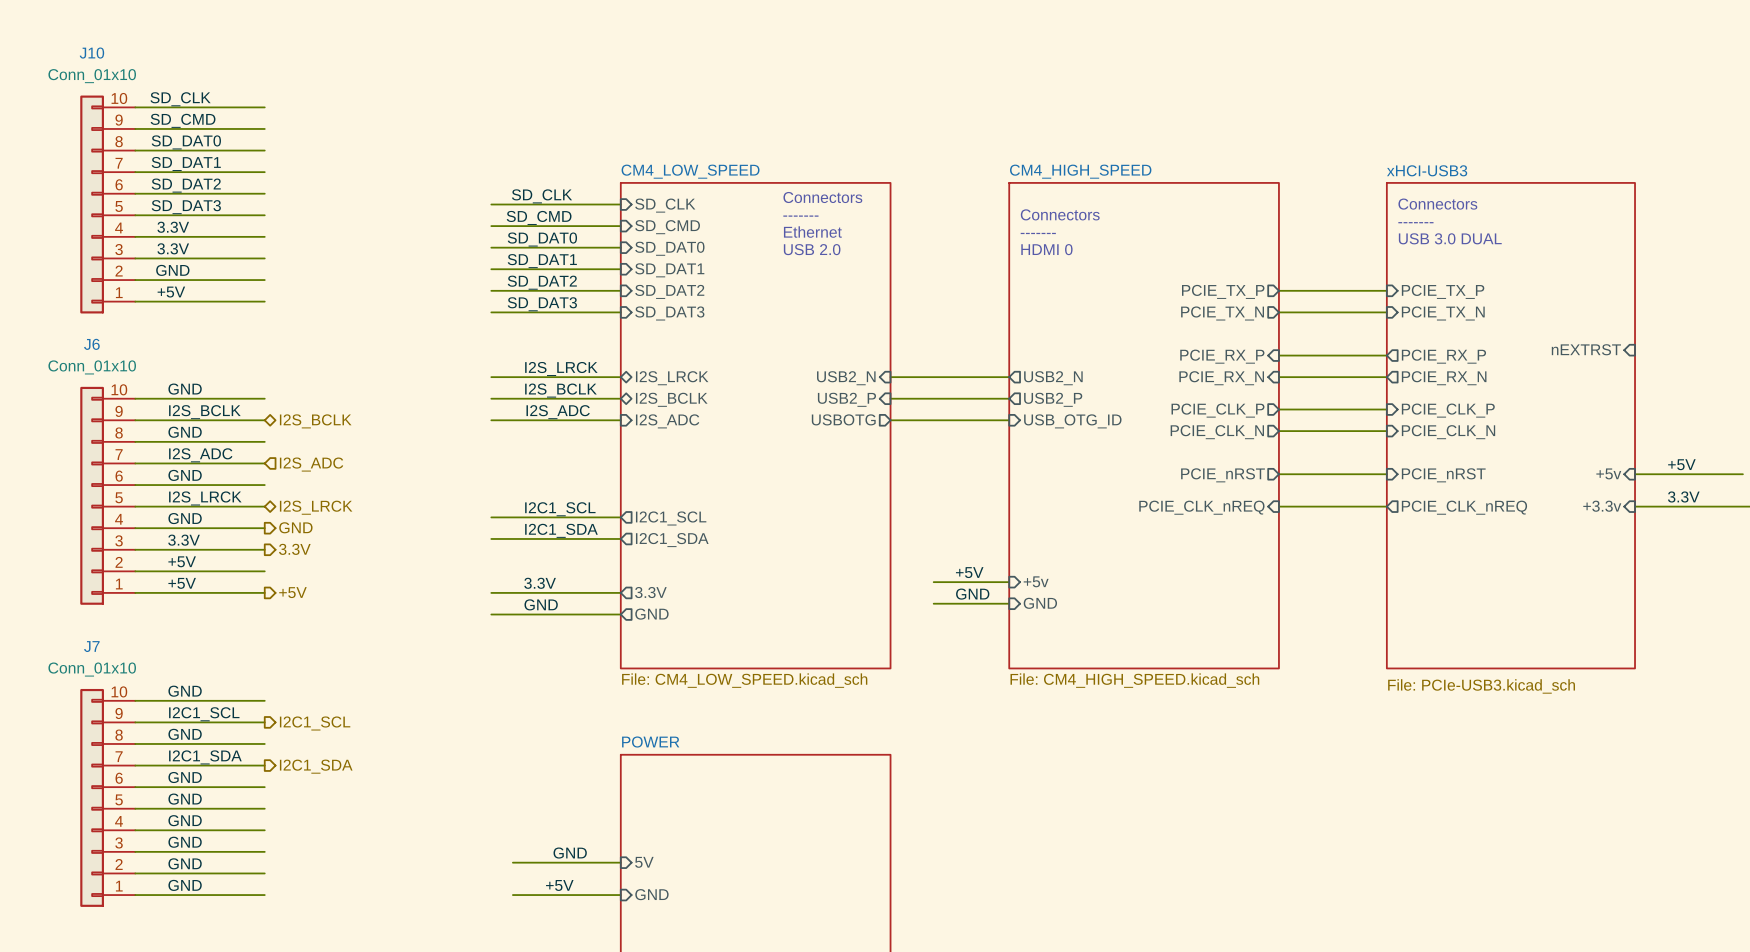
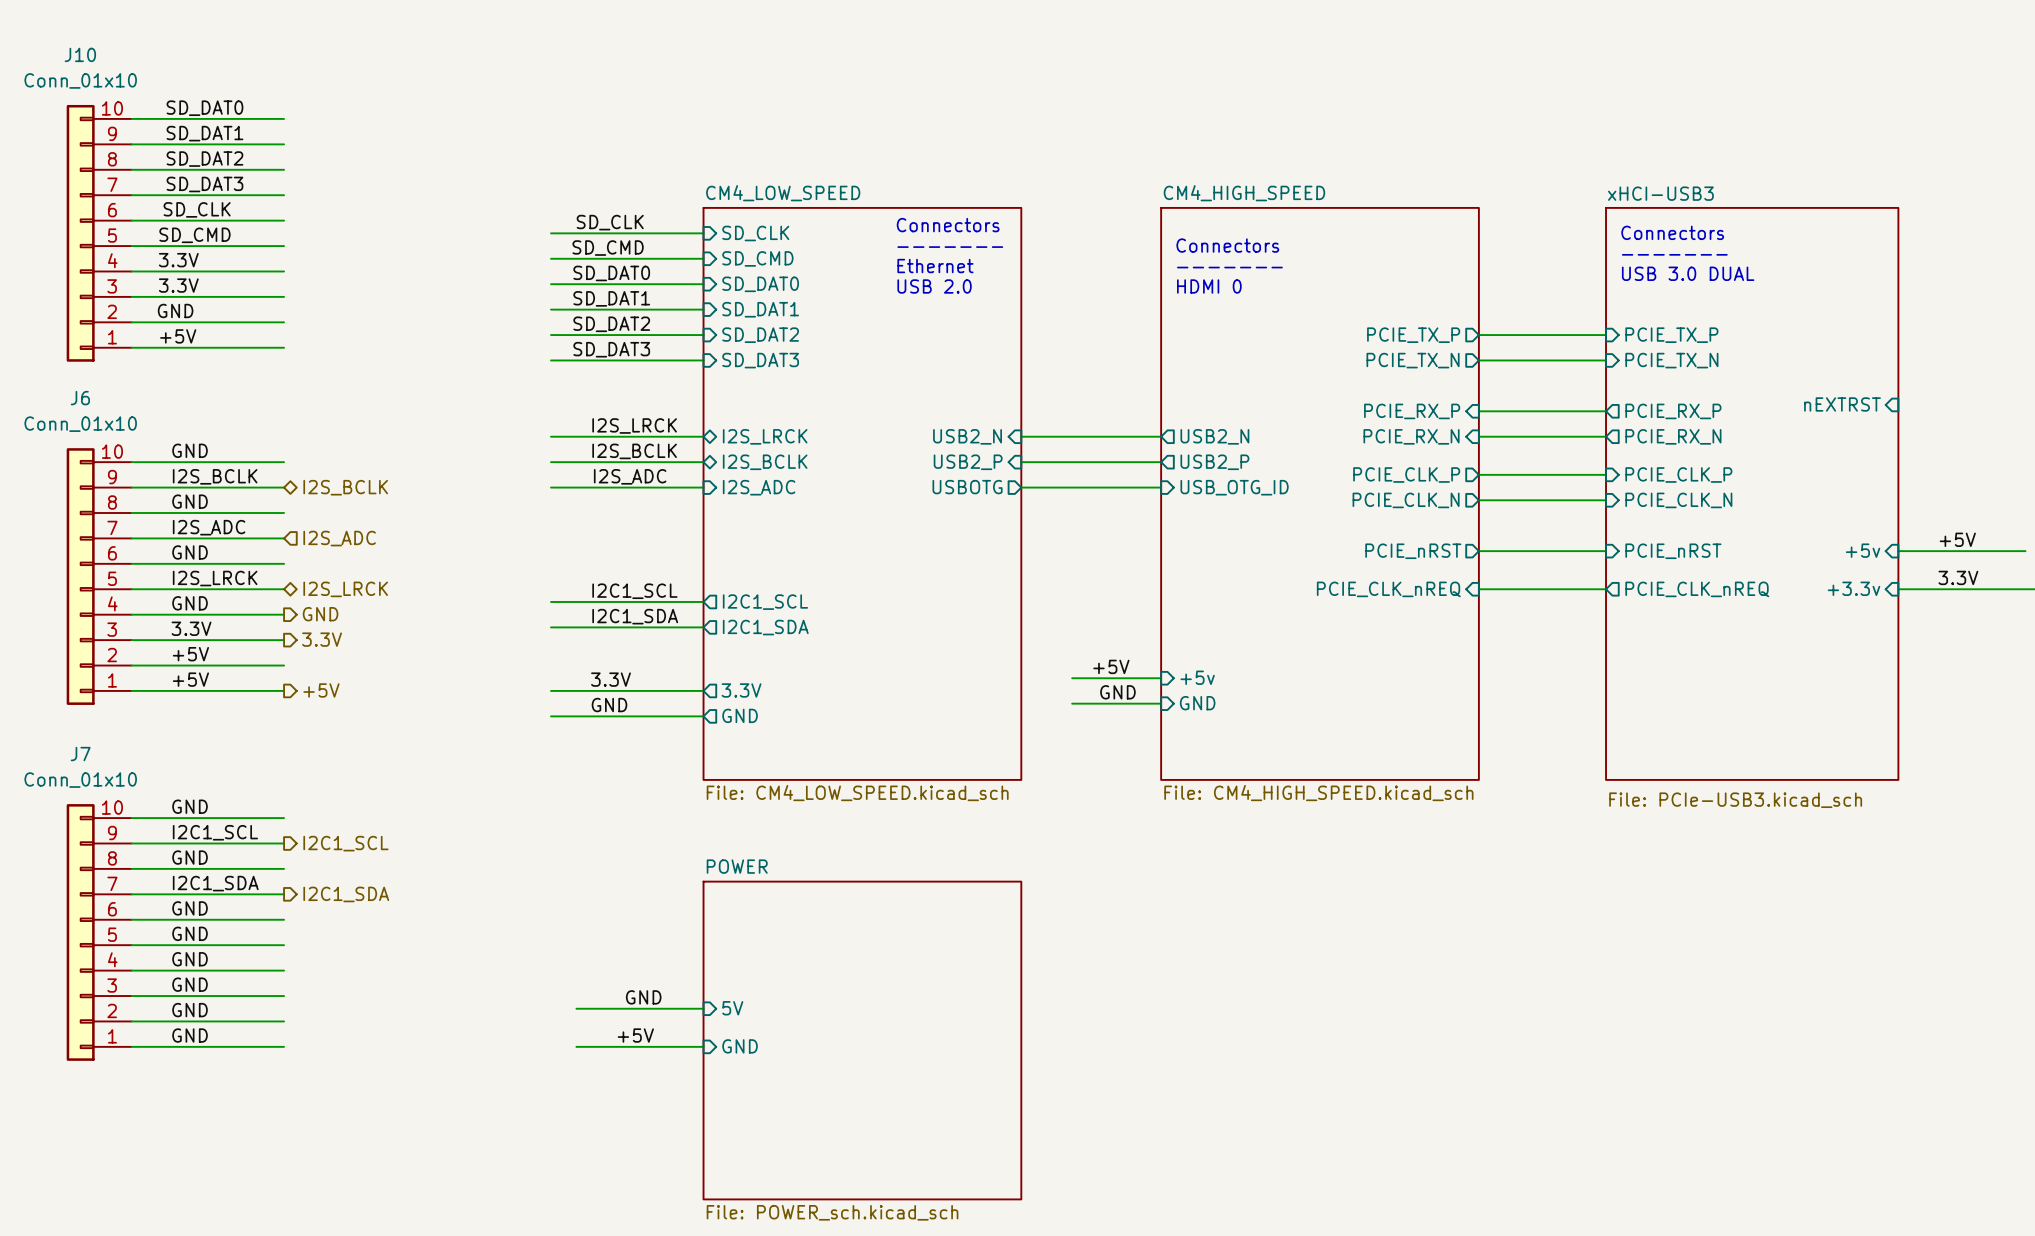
label: SD_CLK (180, 99) -> none
label: SD_CMD (183, 120) -> SD_DAT2 (204, 159)
label position: SD_DAT0 (186, 142) -> SD_DAT0 (204, 108)
label position: SD_DAT1 (186, 163) -> SD_DAT1 (204, 133)
label: none -> SD_DAT3 (204, 184)
label: SD_DAT2 (186, 185) -> SD_CLK (197, 209)
label: SD_DAT3 (186, 207) -> SD_CMD (194, 235)

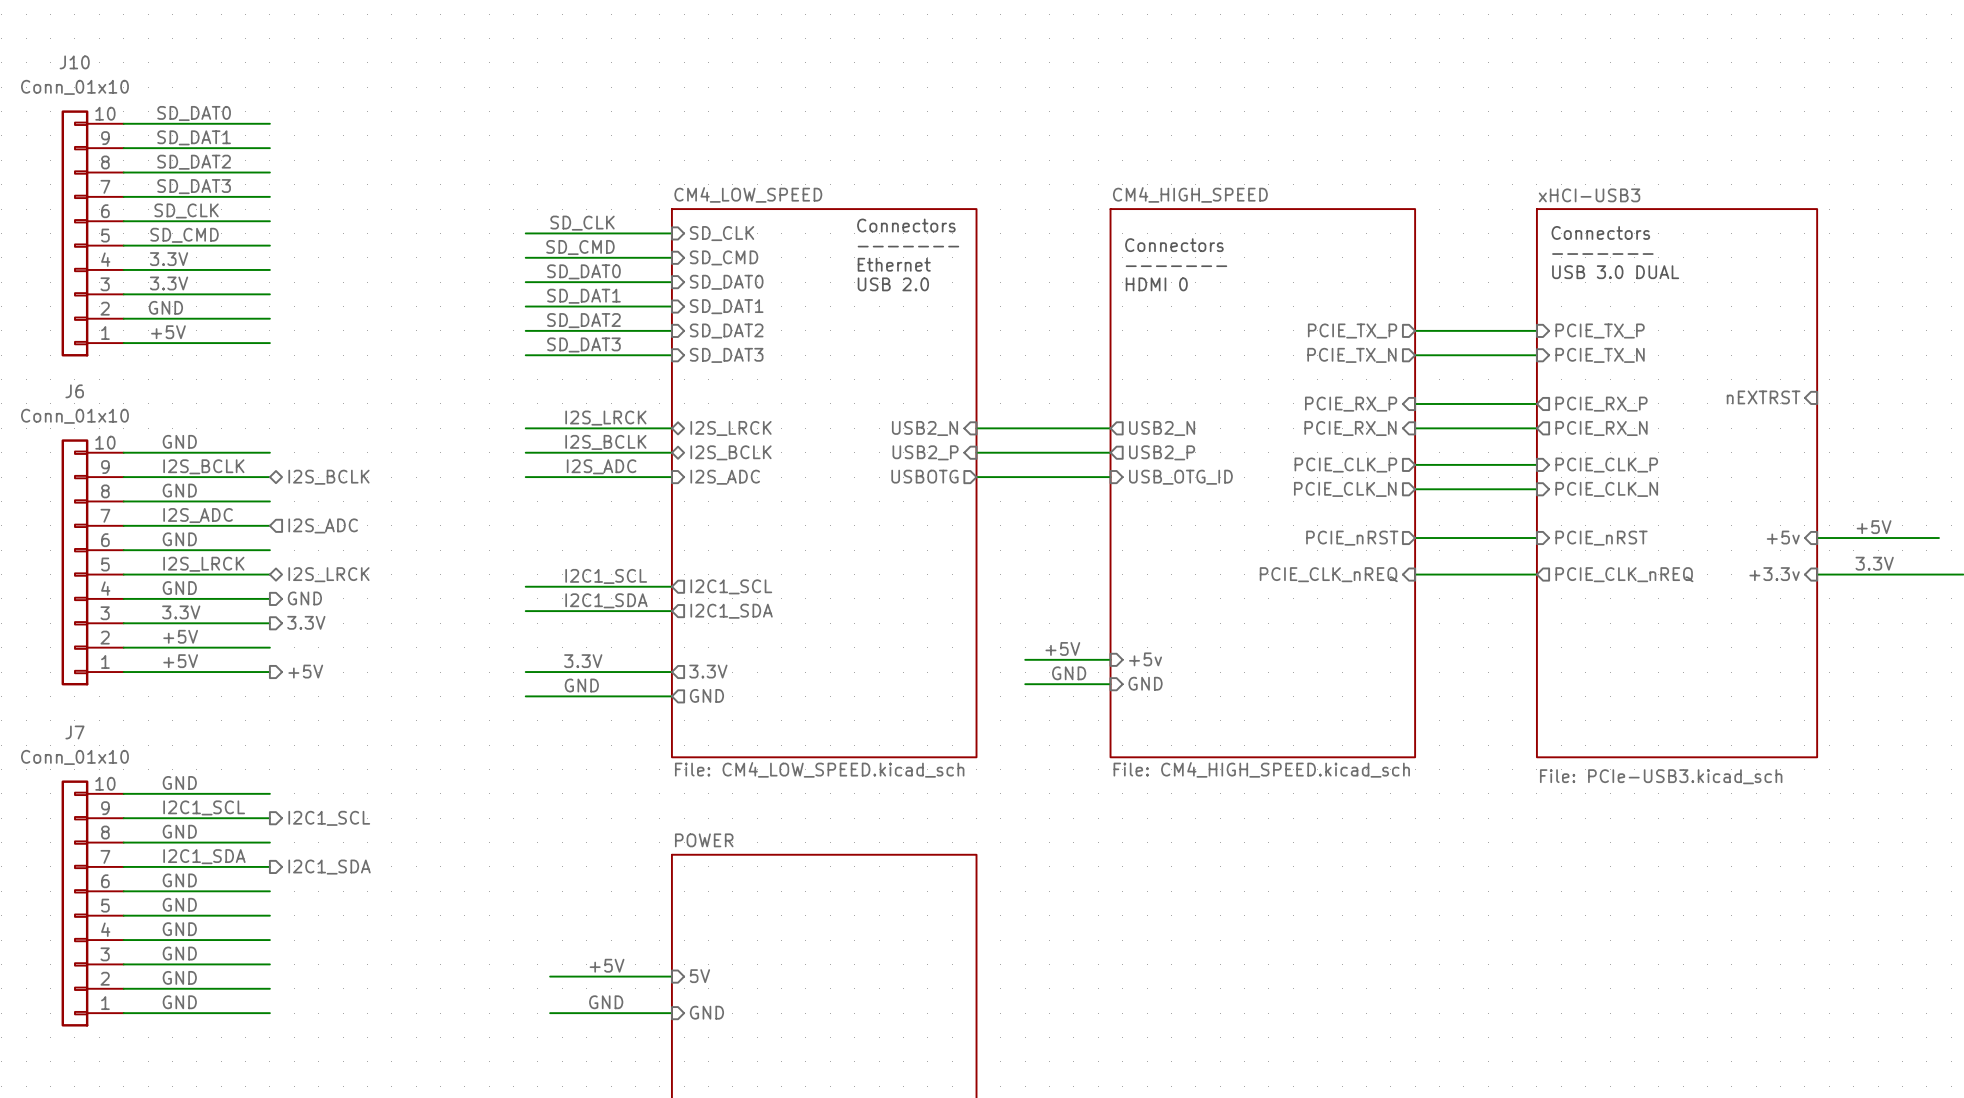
label: GND (643, 997) -> +5V (607, 965)
label: +5V (635, 1035) -> GND (606, 1002)

